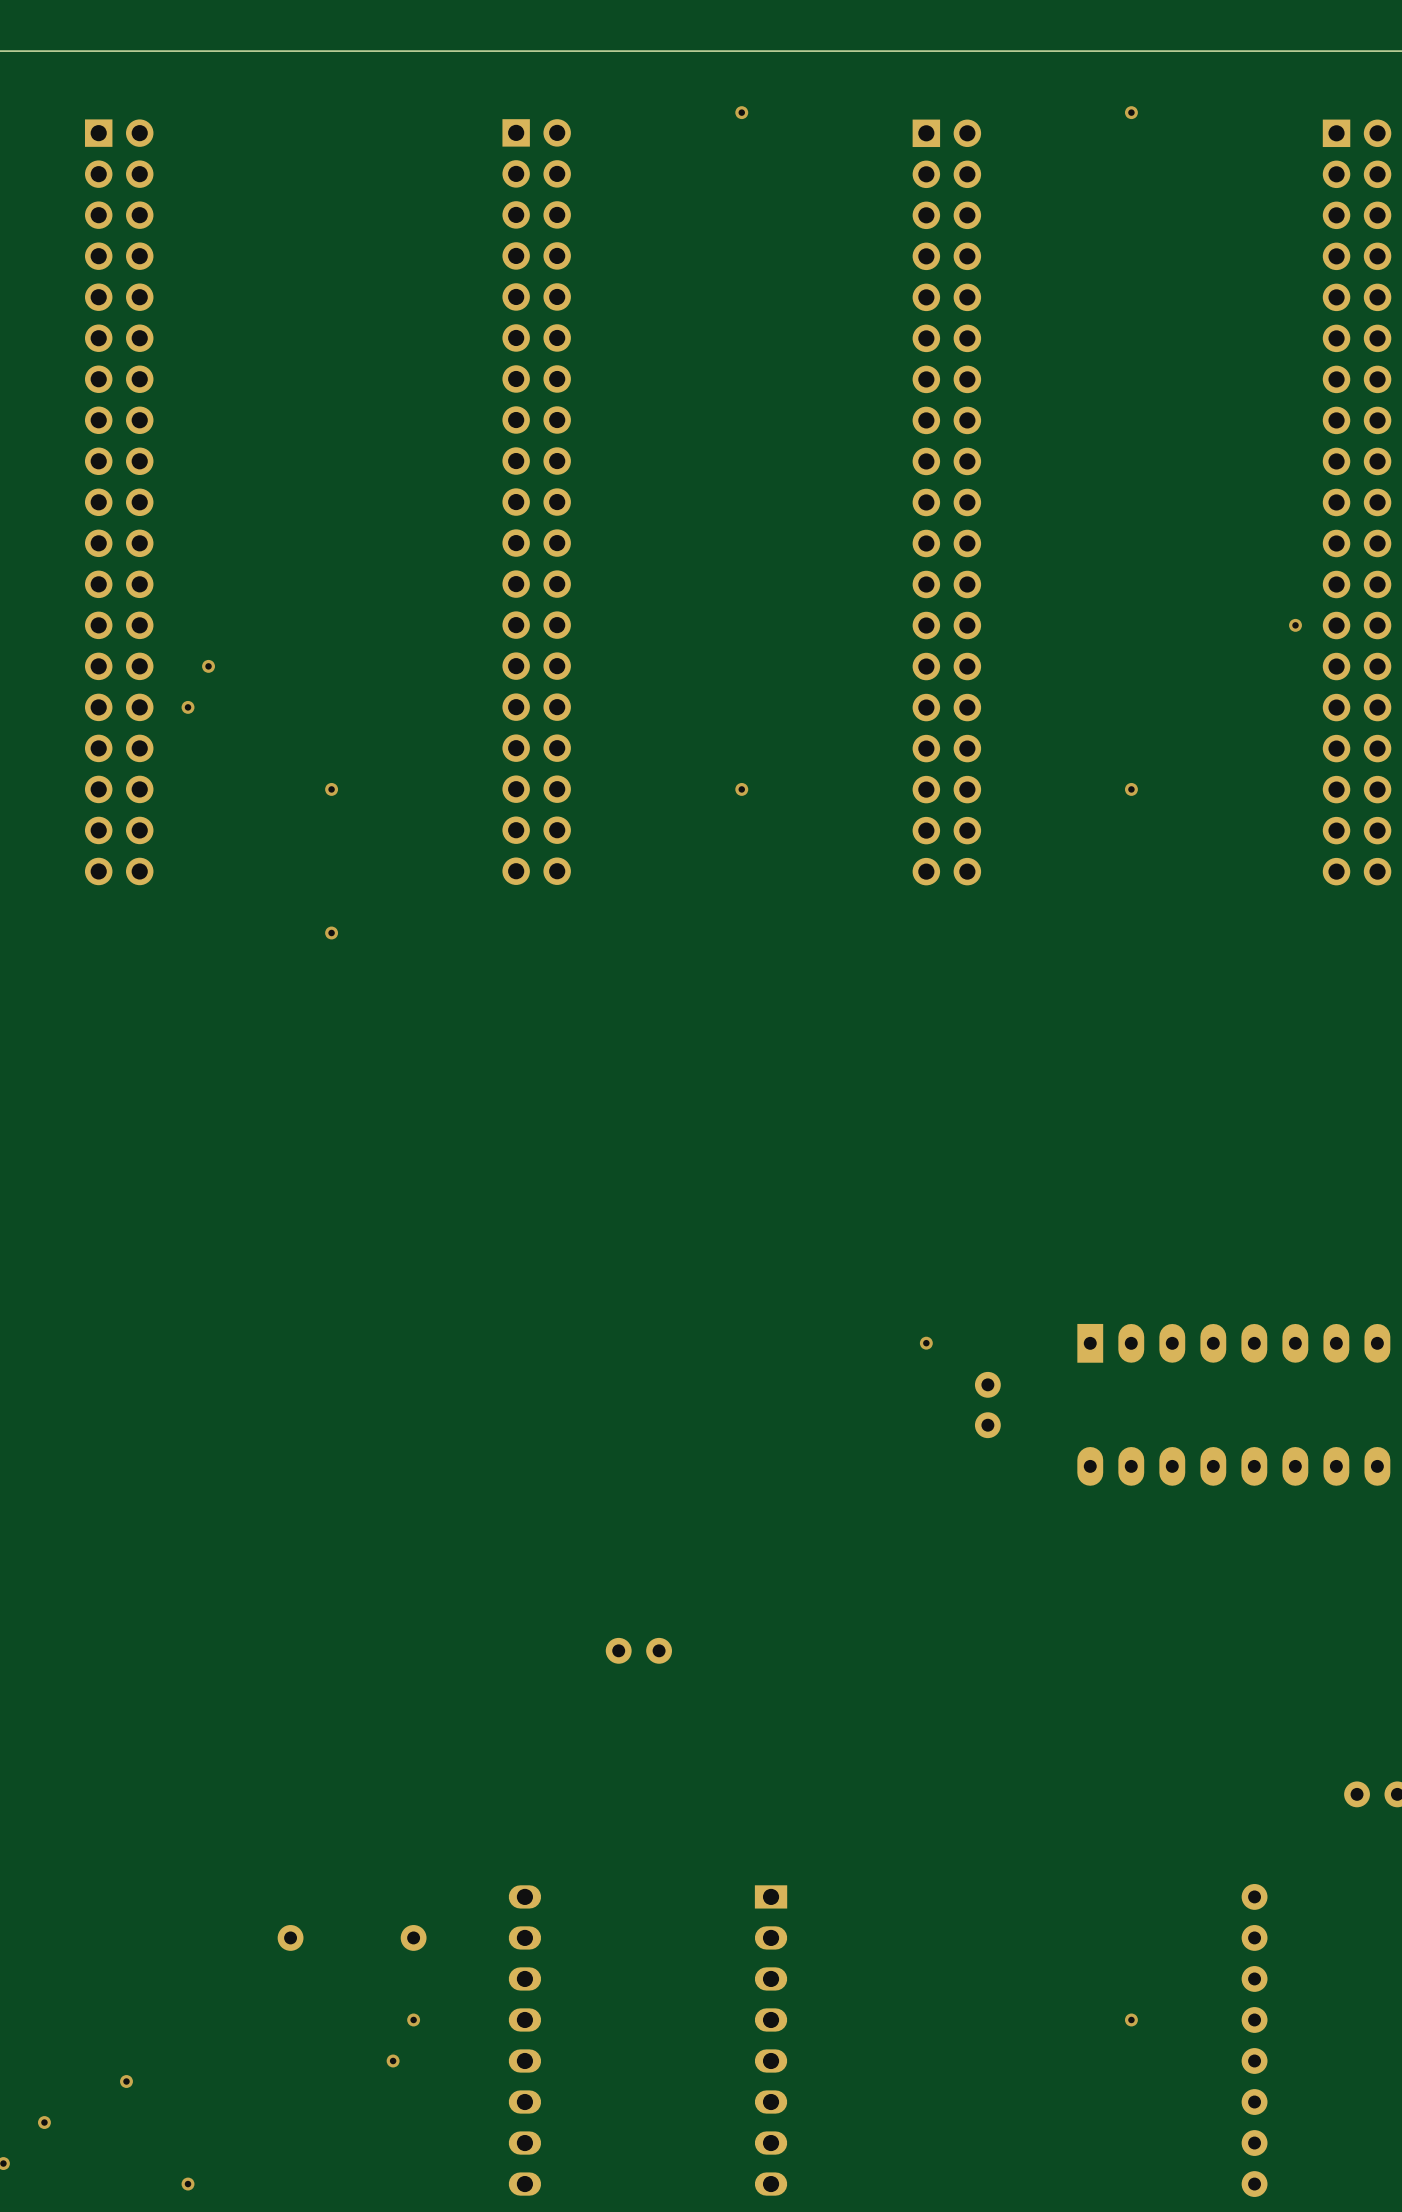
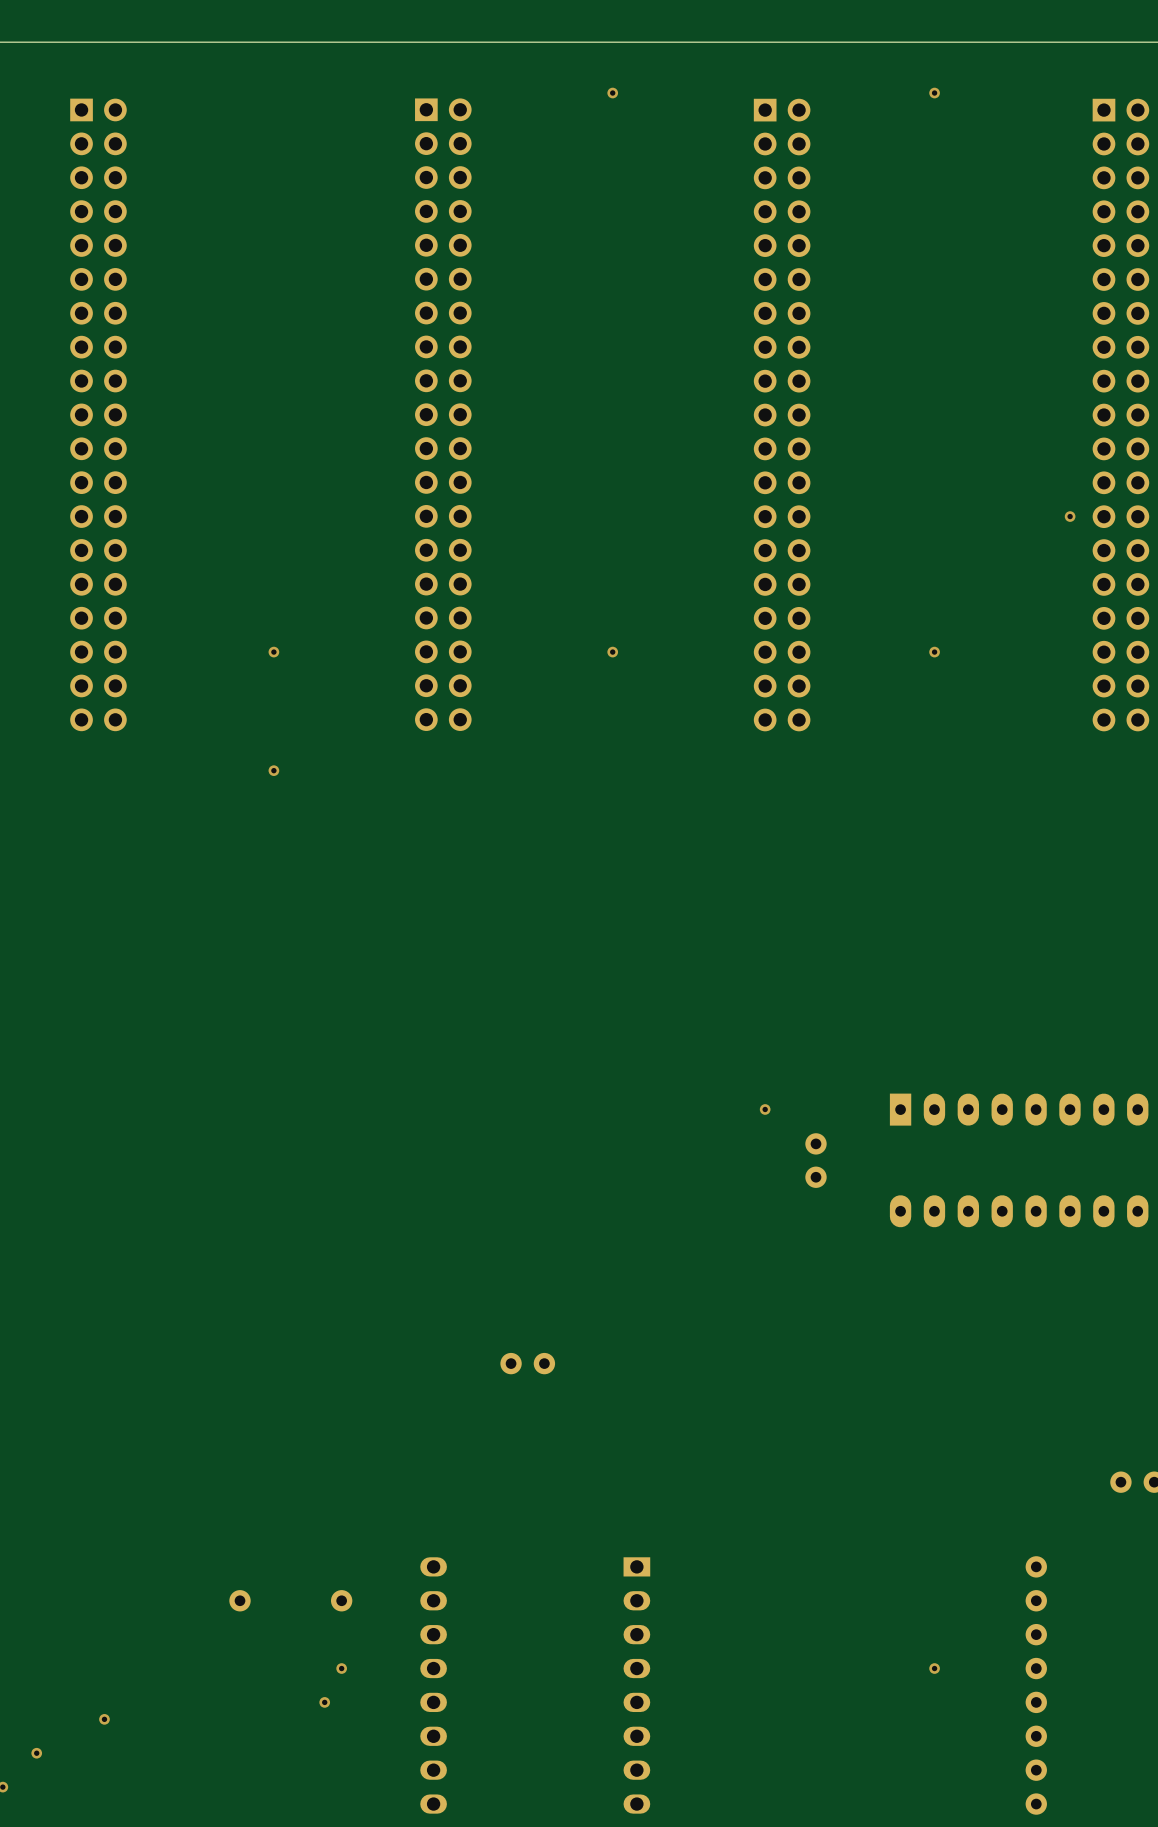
via: (208, 666) -> none
via: (188, 707) -> none
via: (188, 2184) -> none

